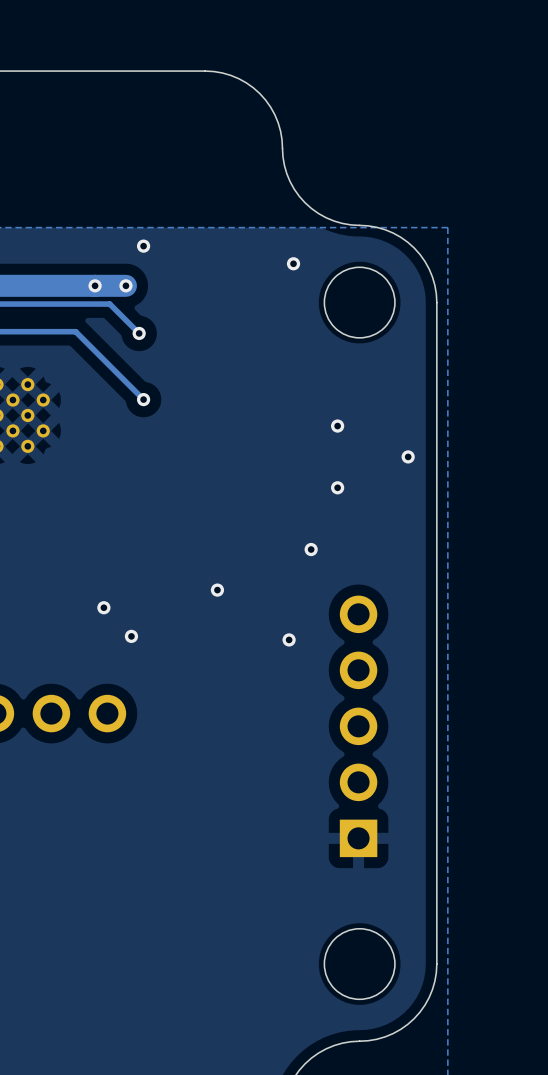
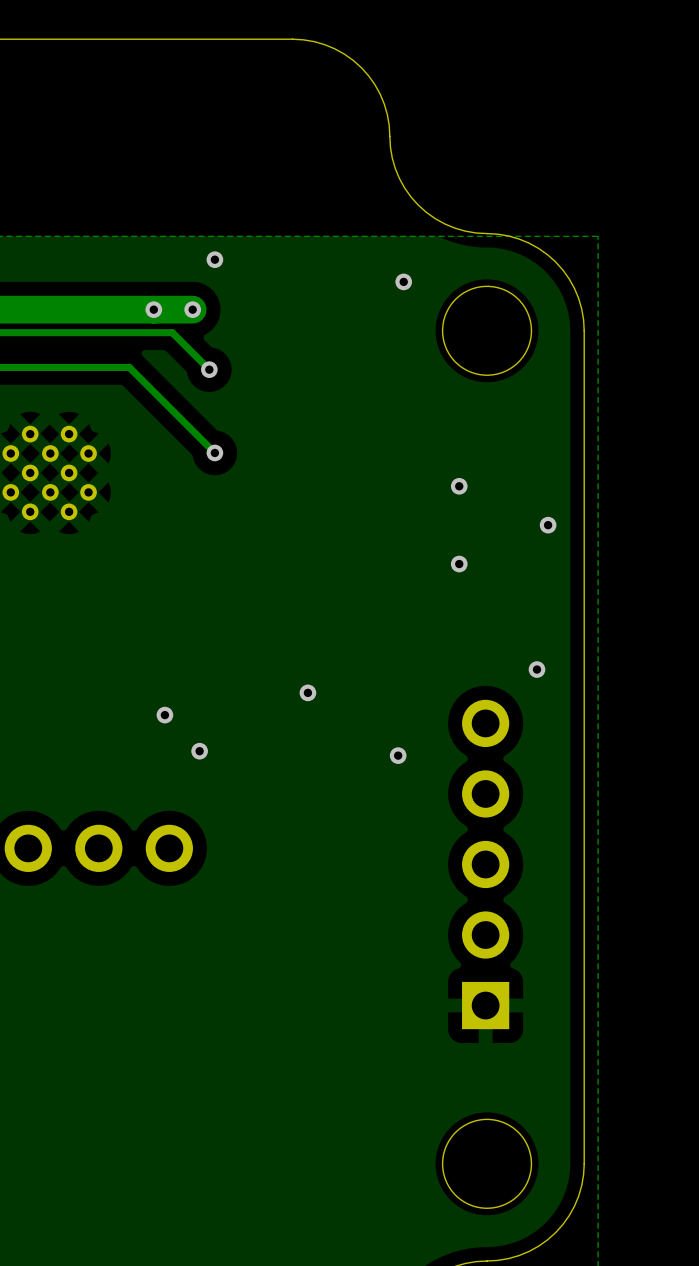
via position: (311, 549) -> (537, 669)

